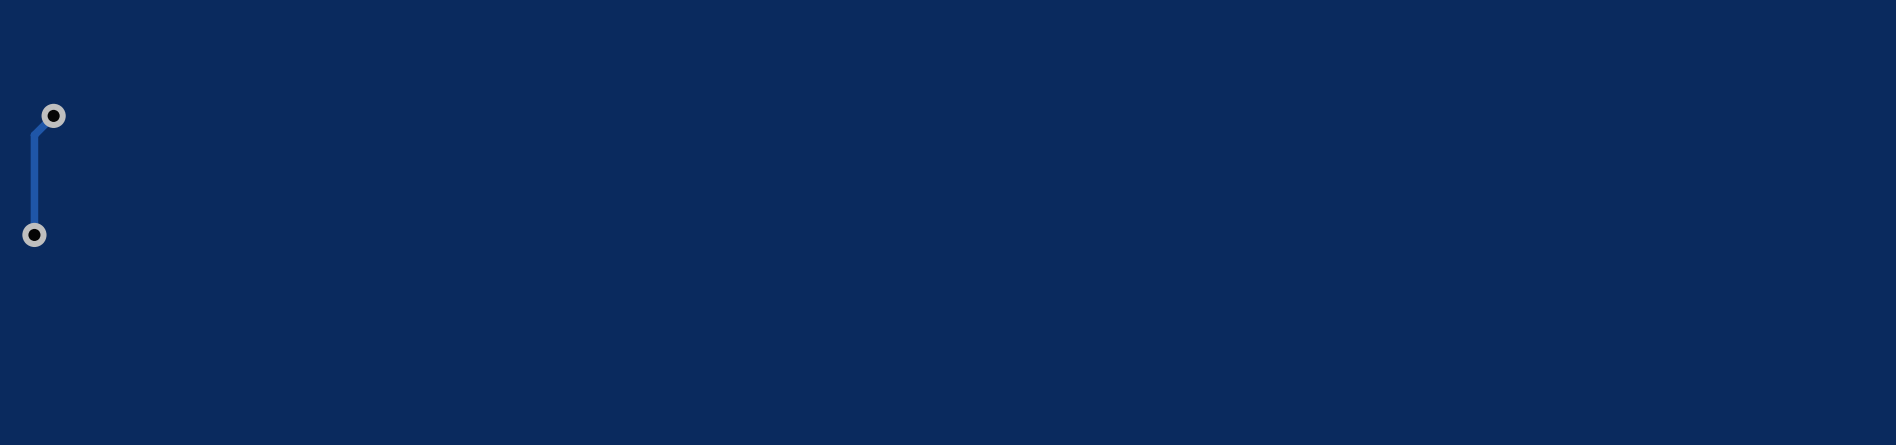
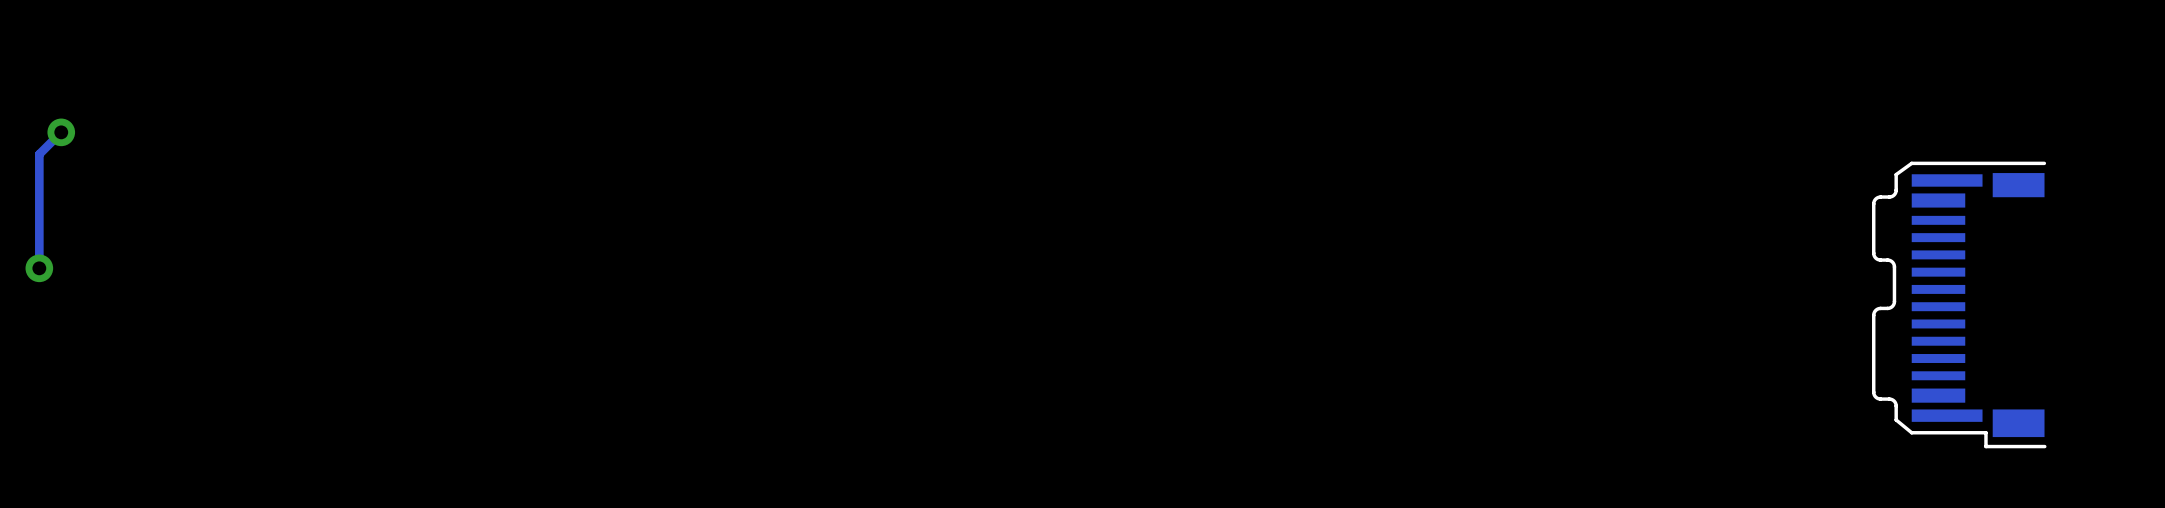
part: none -> (1959, 304)

